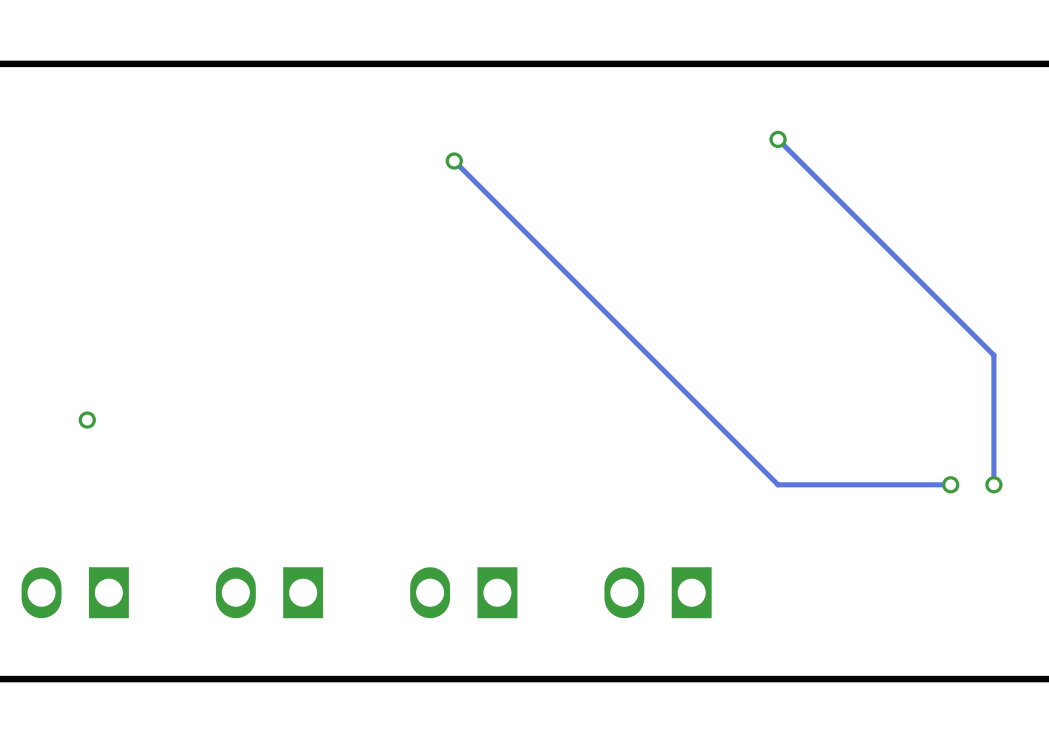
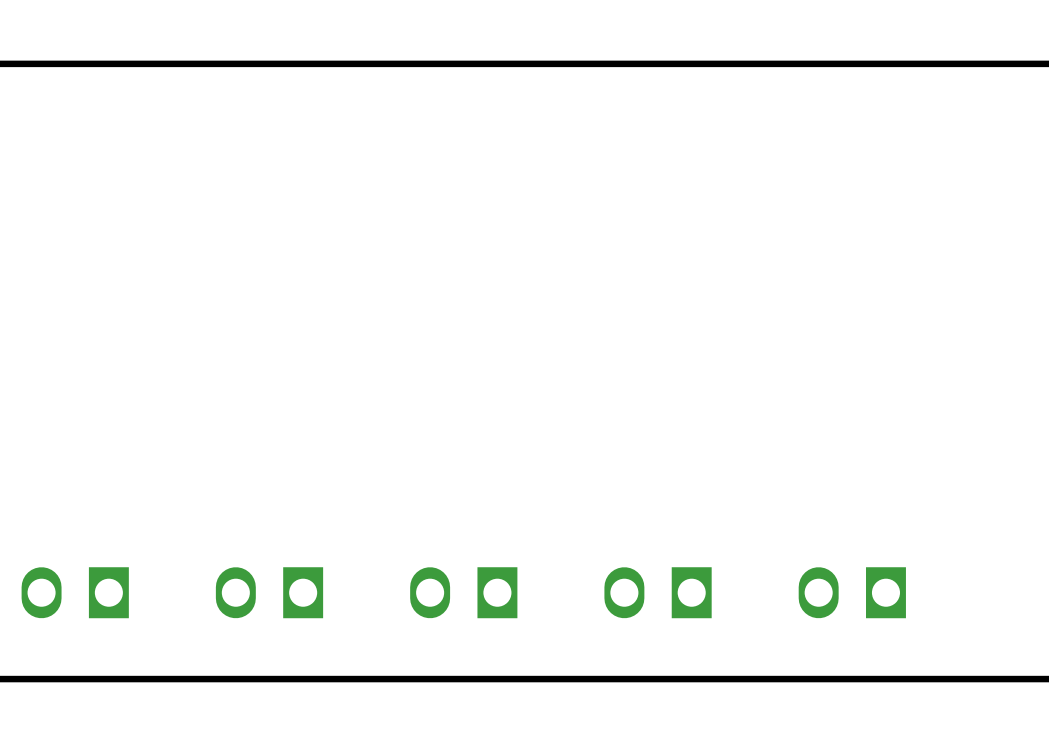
track: (778, 139) (993, 355) (993, 484) -> none
via: (778, 139) -> none
track: (454, 161) (778, 484) (950, 484) -> none
via: (454, 161) -> none
via: (87, 420) -> none
via: (950, 484) -> none
via: (993, 484) -> none
part: none -> (852, 592)

